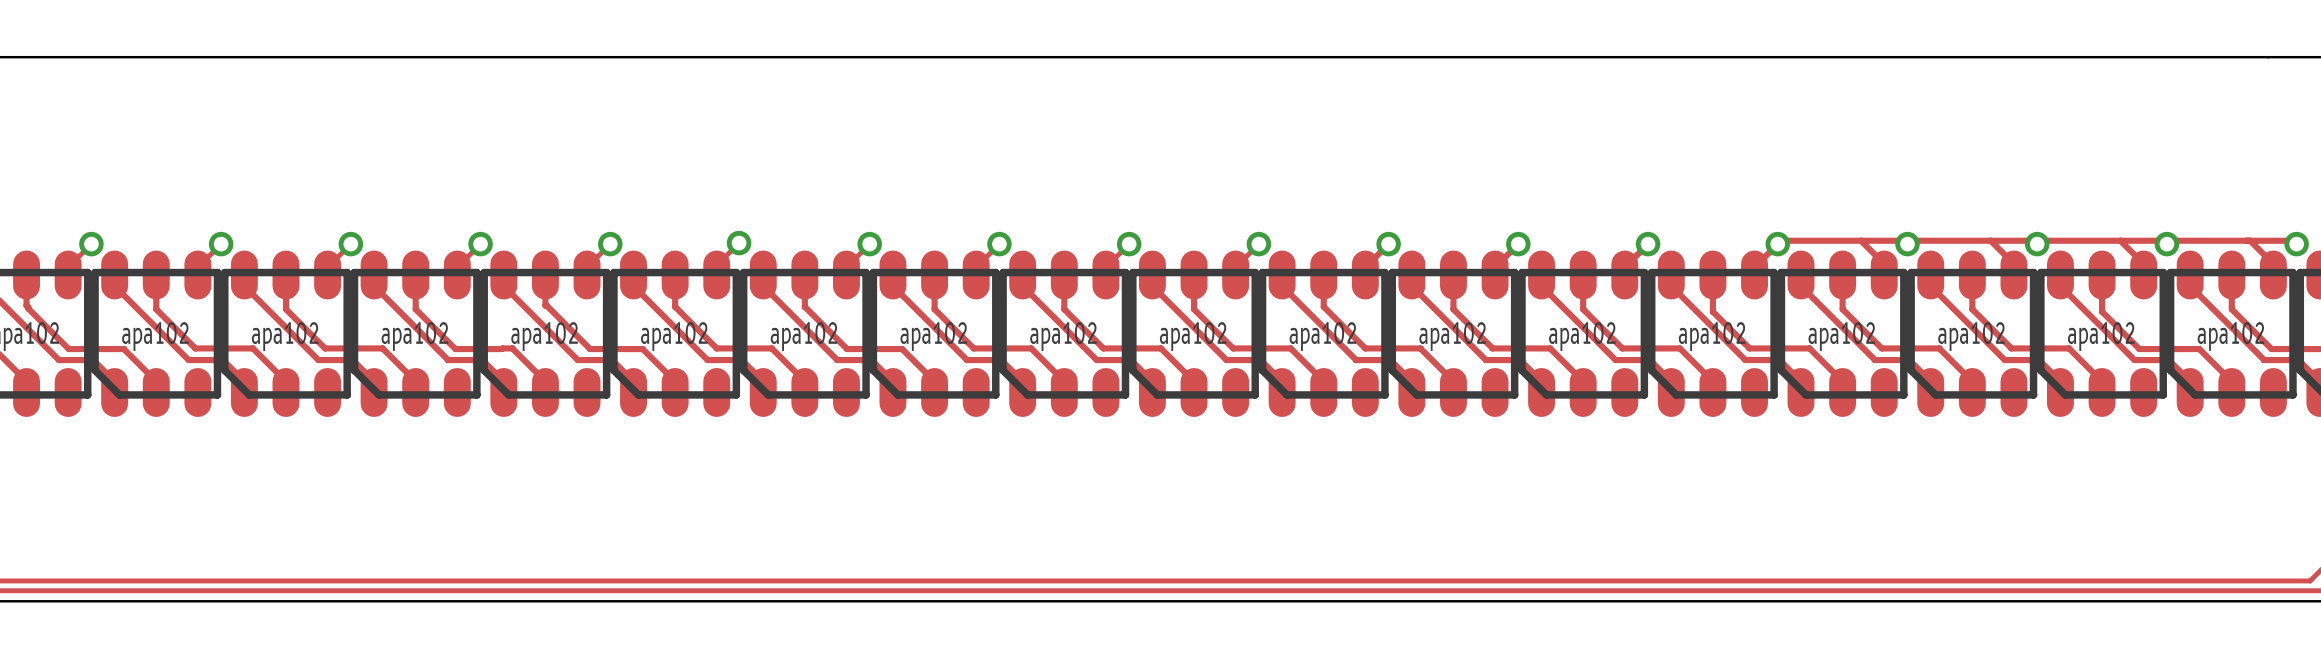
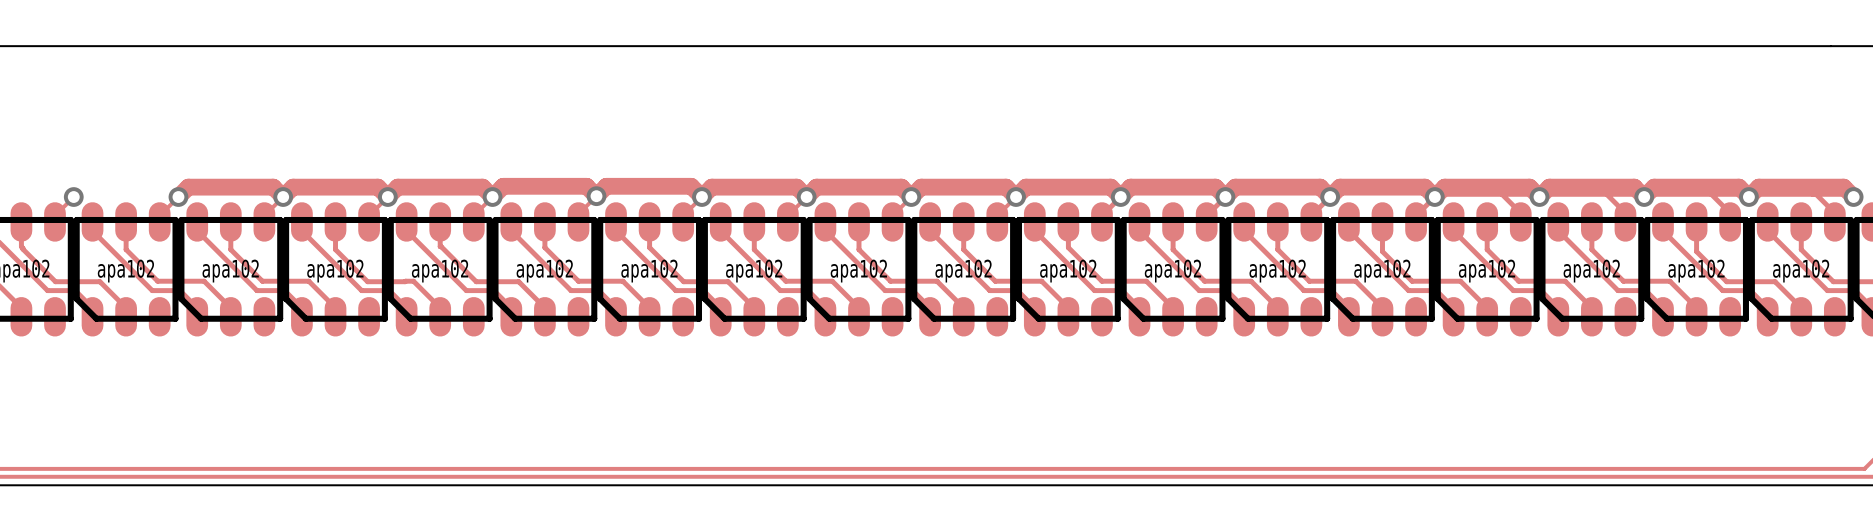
track: none -> (178, 197) (188, 187) (273, 187) (283, 197) (293, 187) (377, 187) (387, 197) (397, 187) (482, 187) (492, 197) (503, 186) (586, 186) (596, 196) (606, 186) (691, 186) (701, 197) (711, 187) (796, 187) (806, 197) (816, 187) (901, 187) (911, 197) (921, 187) (1006, 187) (1016, 197) (1025, 187) (1110, 187) (1120, 197) (1130, 187) (1215, 187) (1225, 197) (1235, 187) (1320, 187) (1330, 197) (1340, 187) (1424, 187) (1434, 197) (1444, 187) (1529, 187) (1539, 197) (1549, 187) (1634, 187) (1644, 197) (1654, 187) (1739, 187) (1748, 197) (1758, 187) (1843, 187) (1853, 197)

